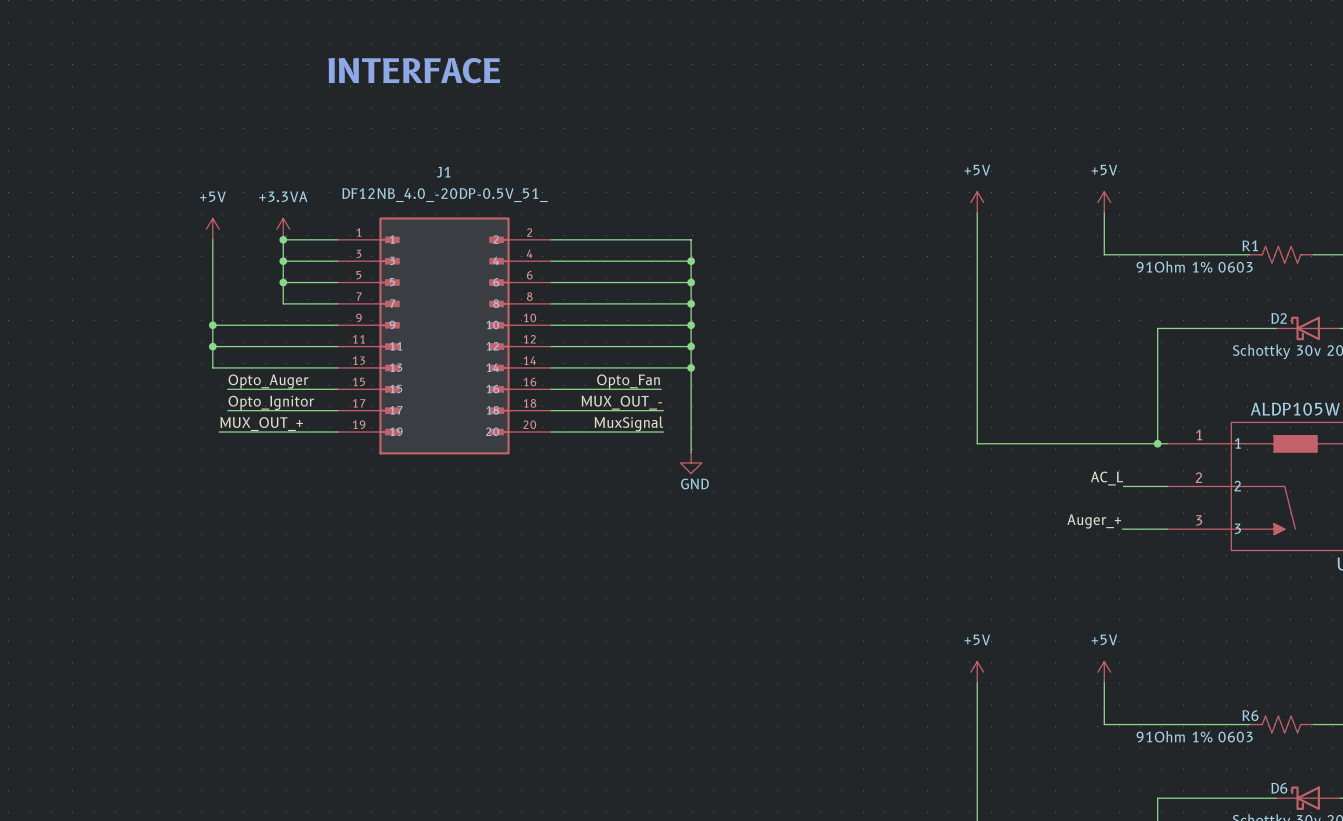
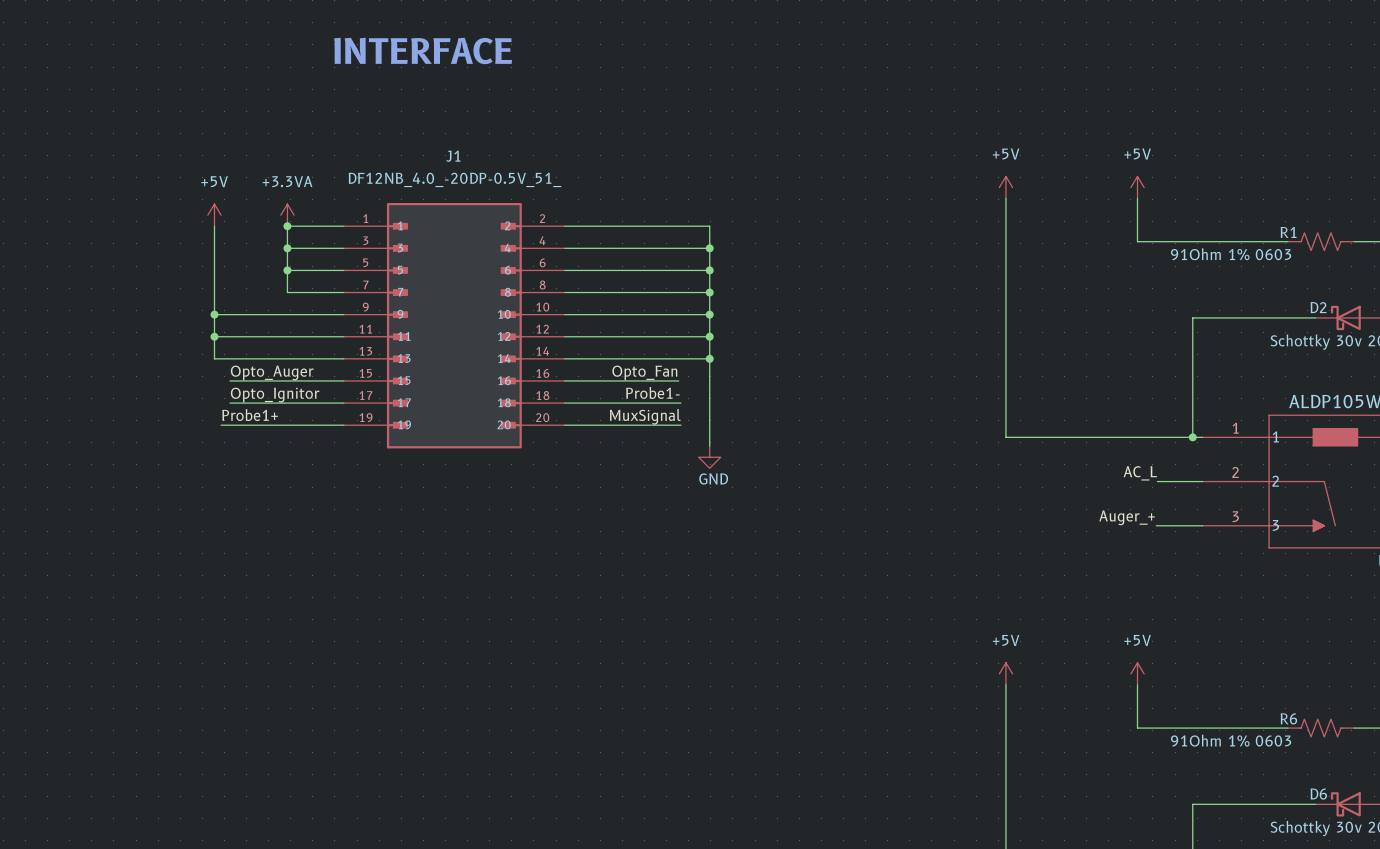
label: MUX_OUT_- (621, 402) -> Probe1- (652, 392)
label: MUX_OUT_+ (261, 424) -> Probe1+ (250, 415)

